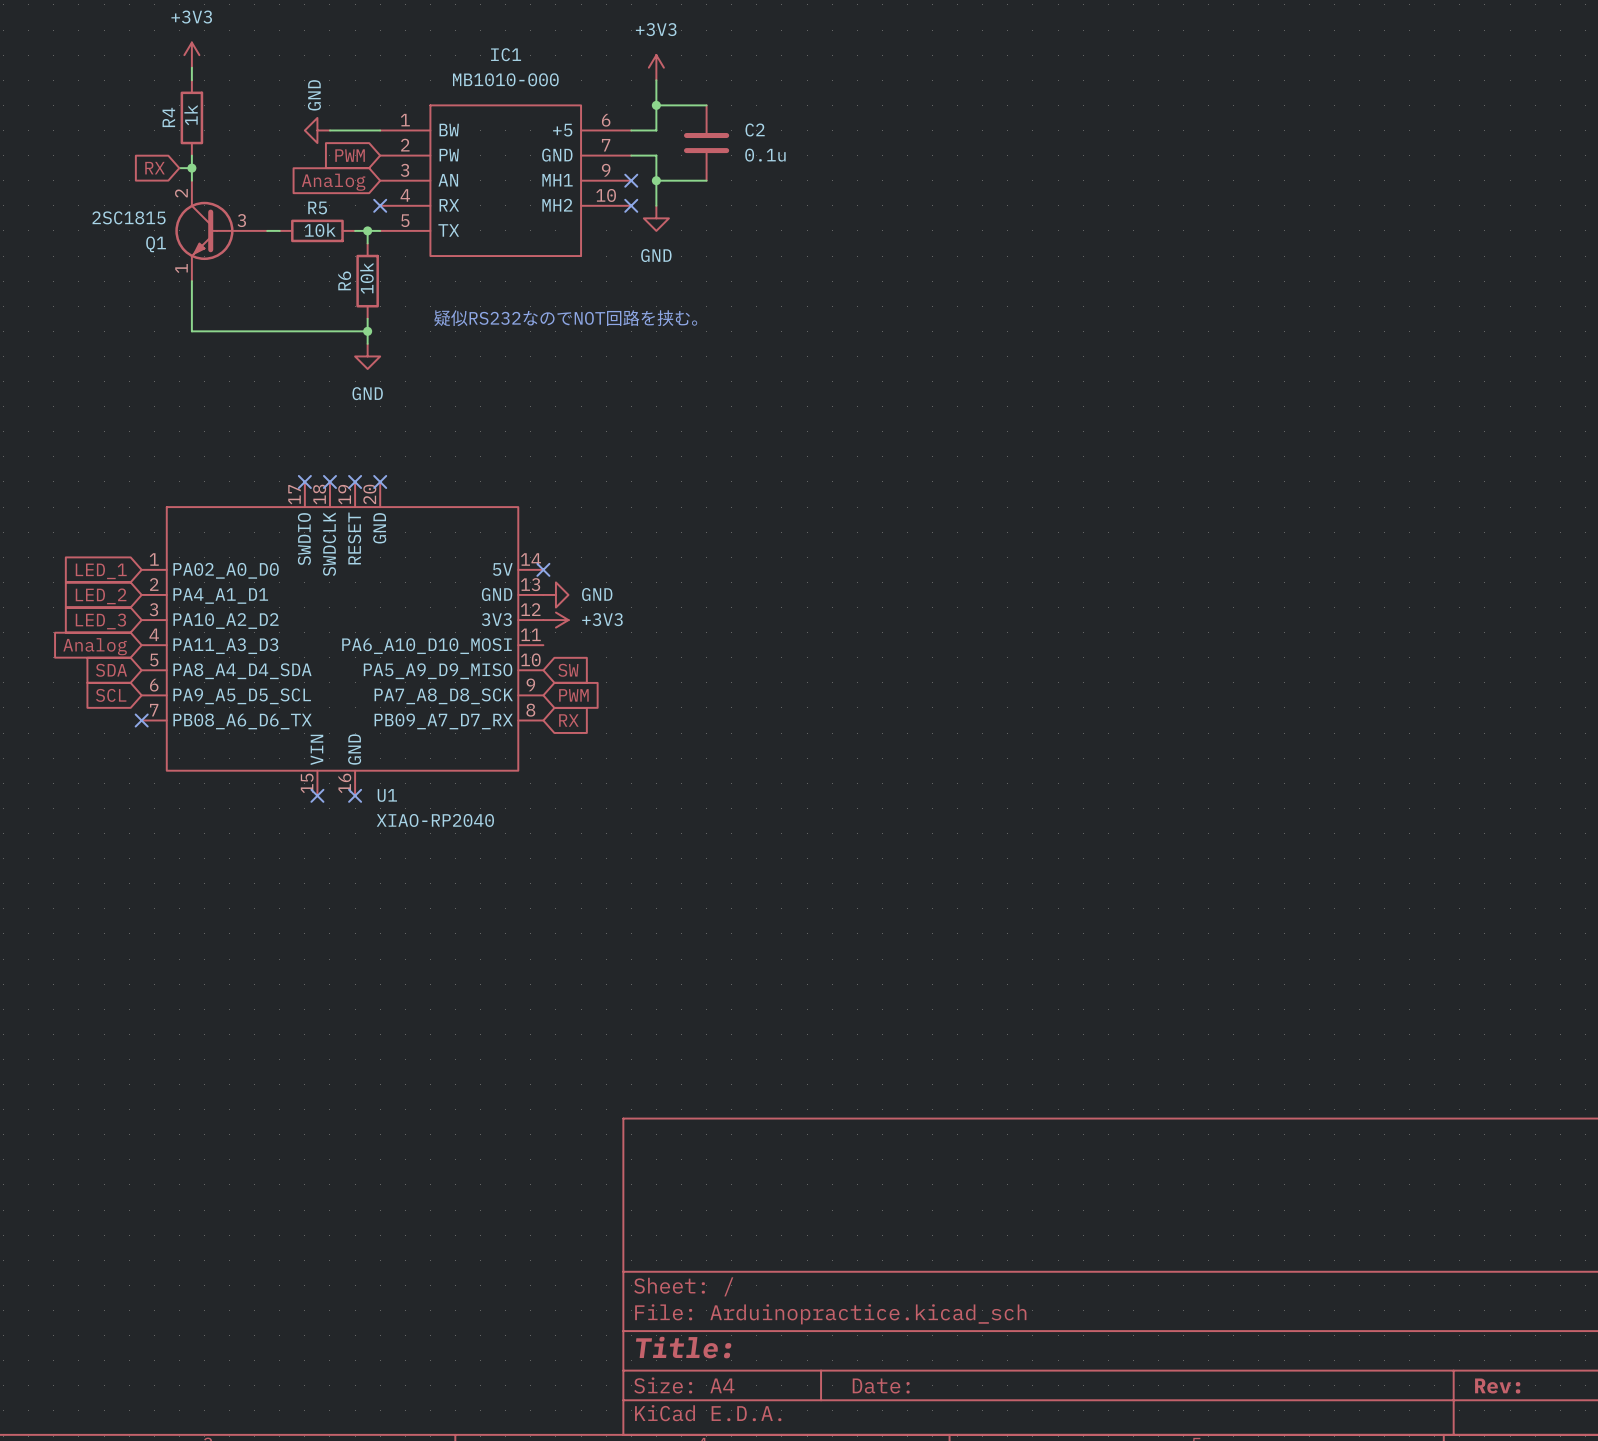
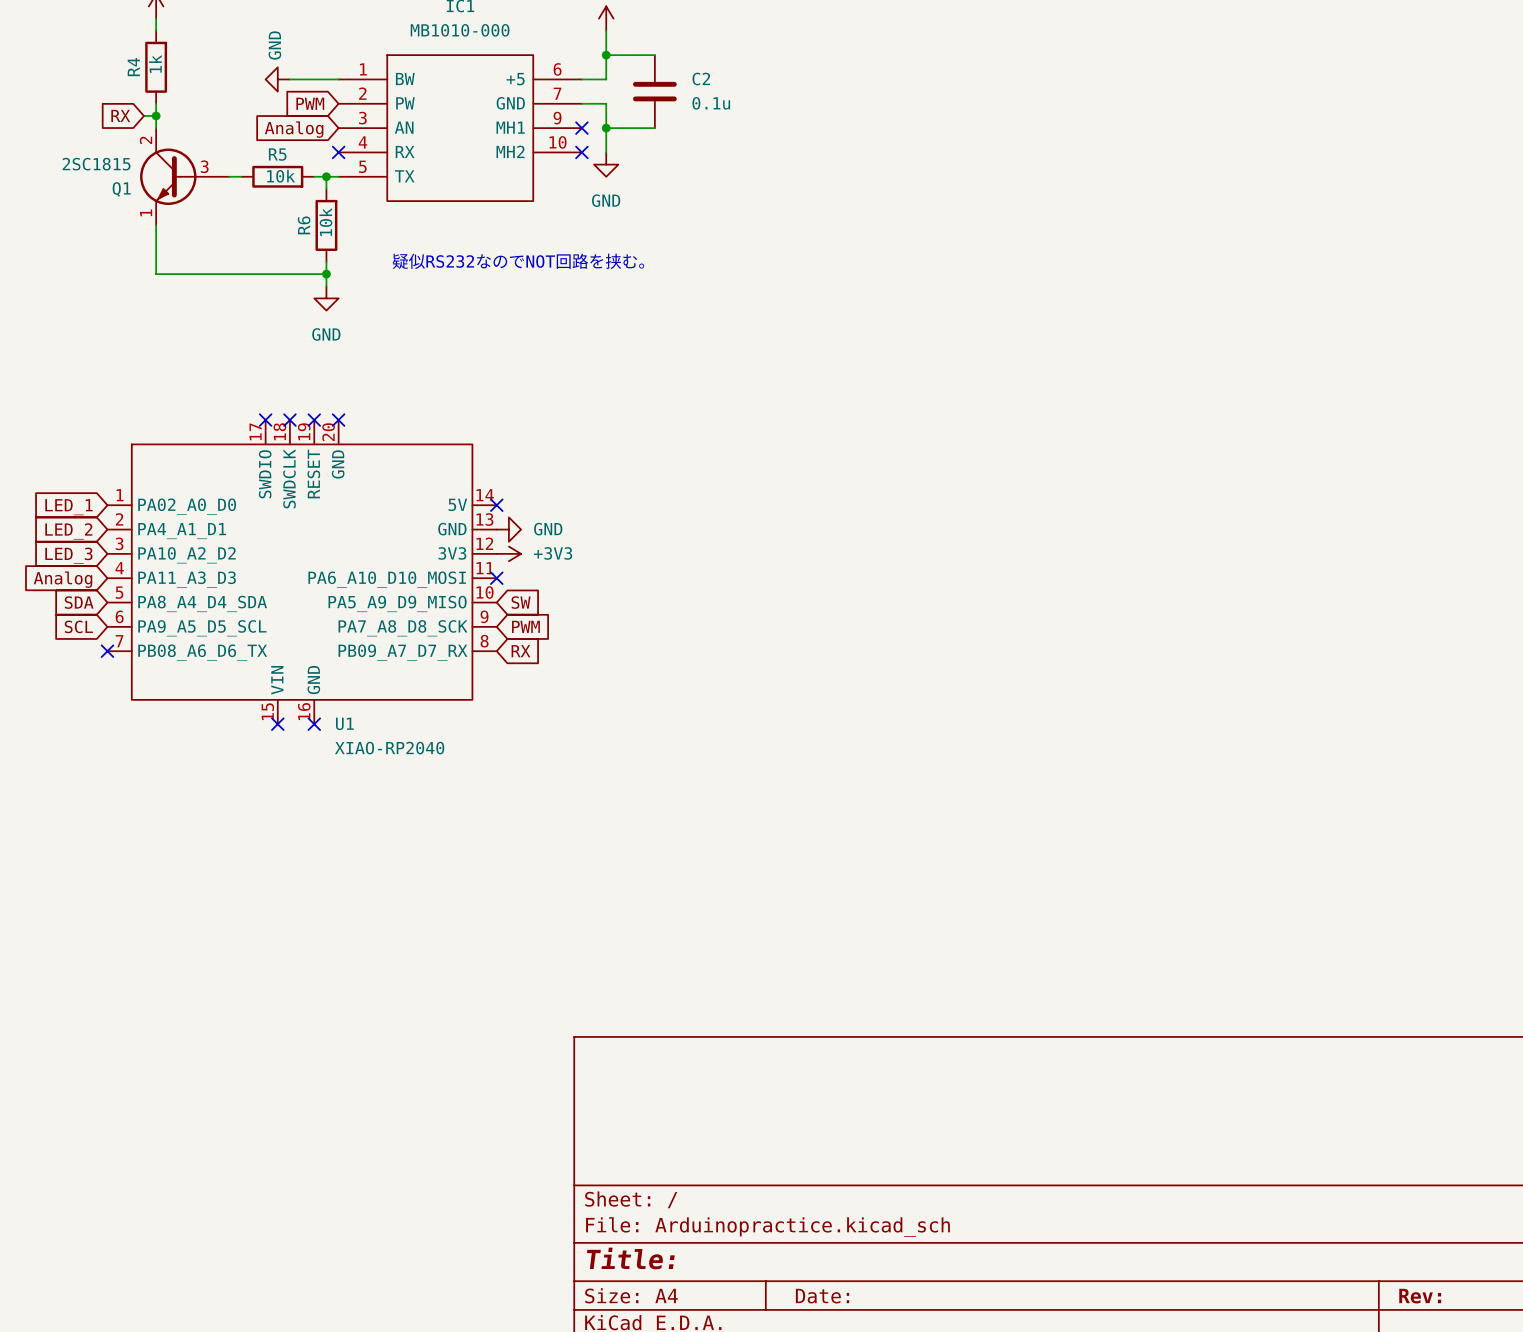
no-connect mark: none -> (496, 578)

